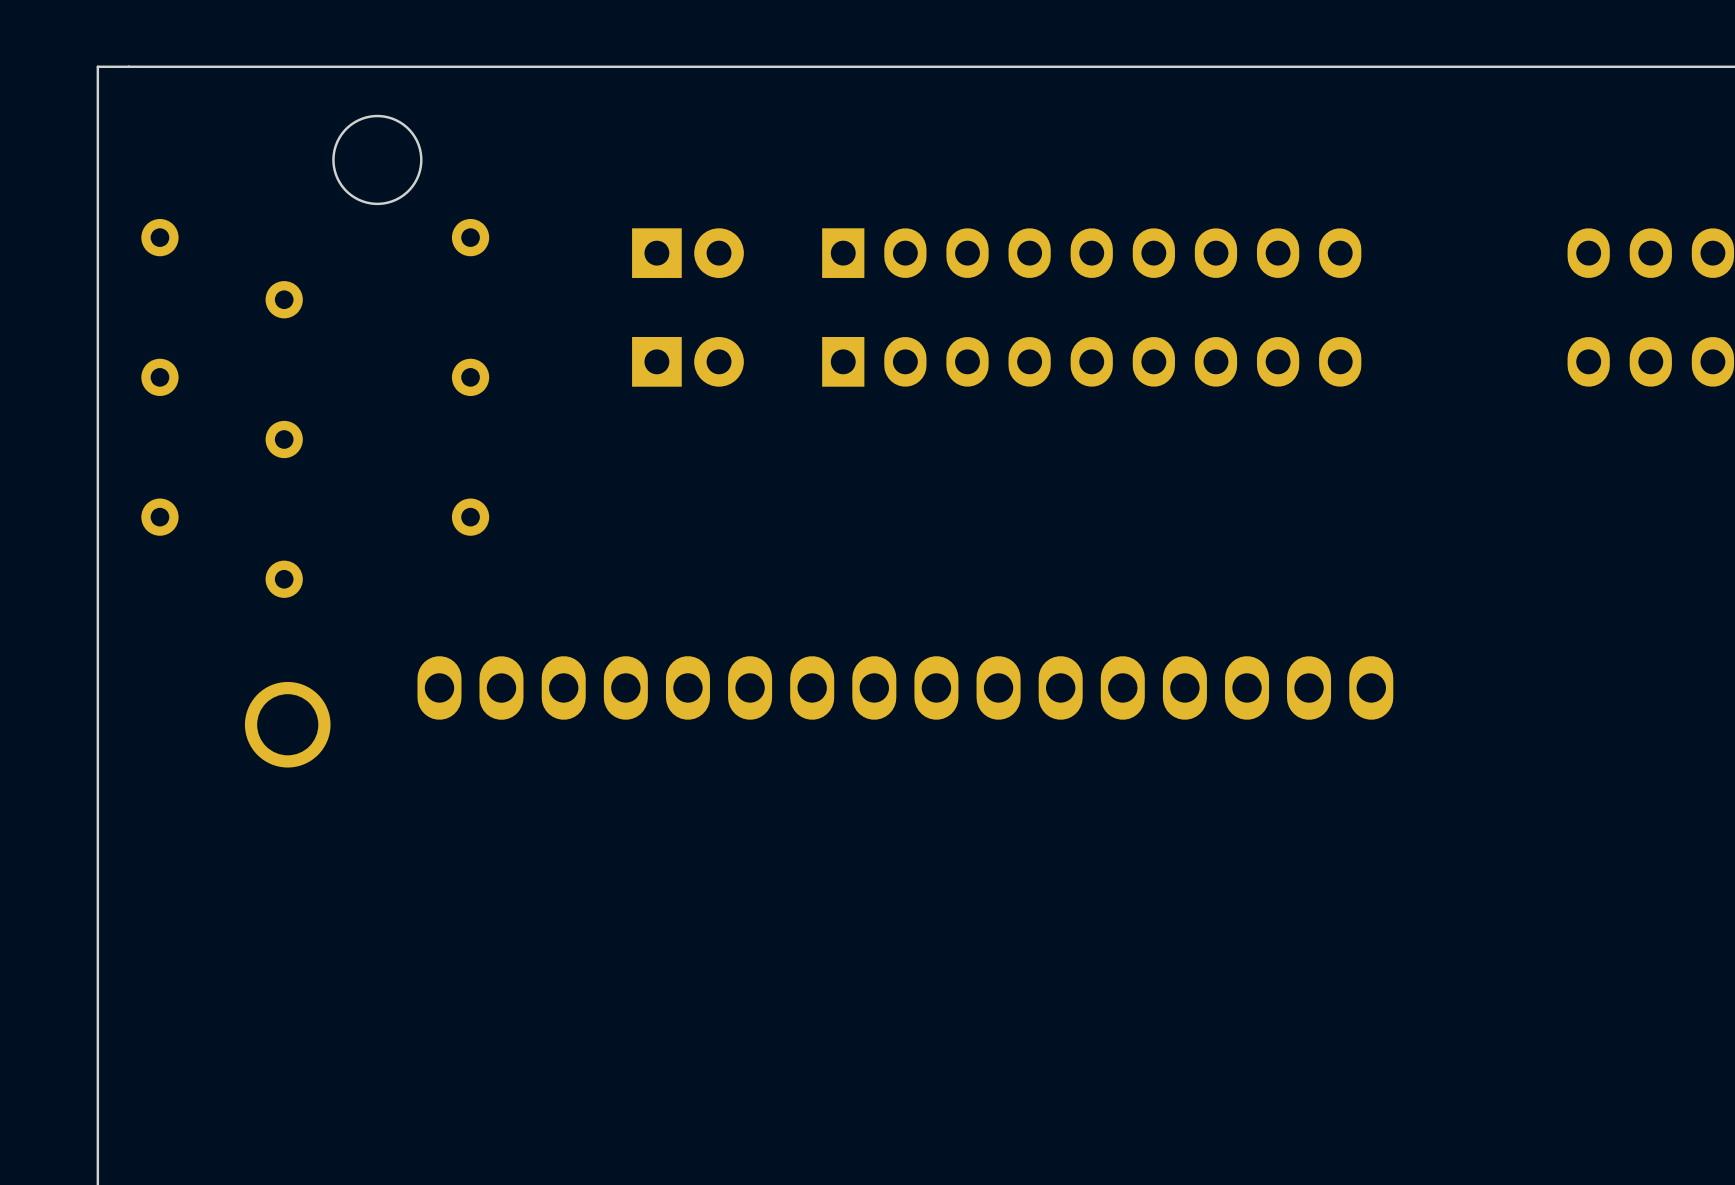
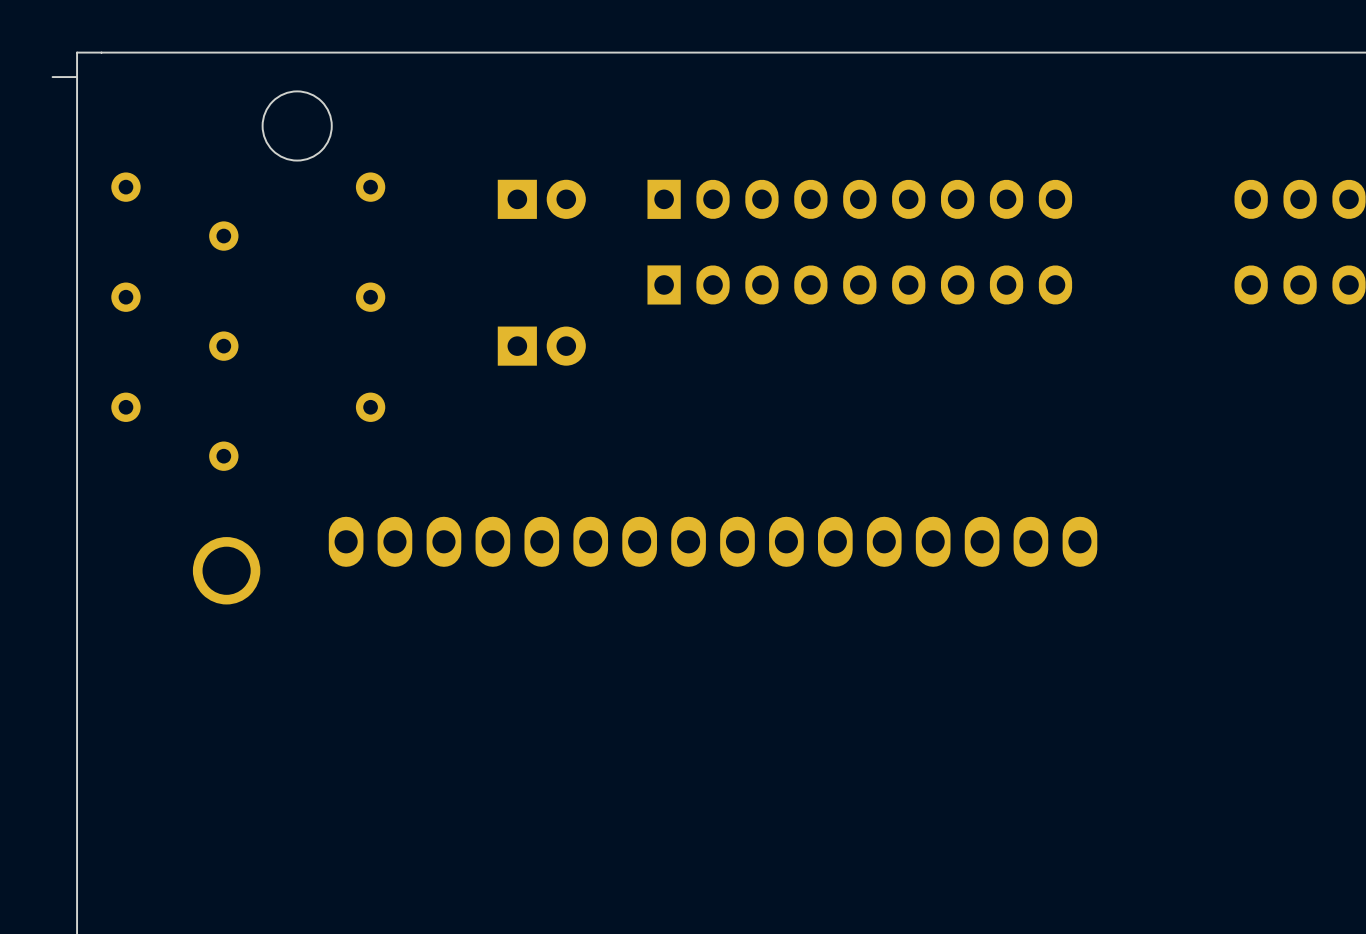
board edge: none -> (77, 77) (52, 77)
part position: (687, 361) -> (541, 346)

